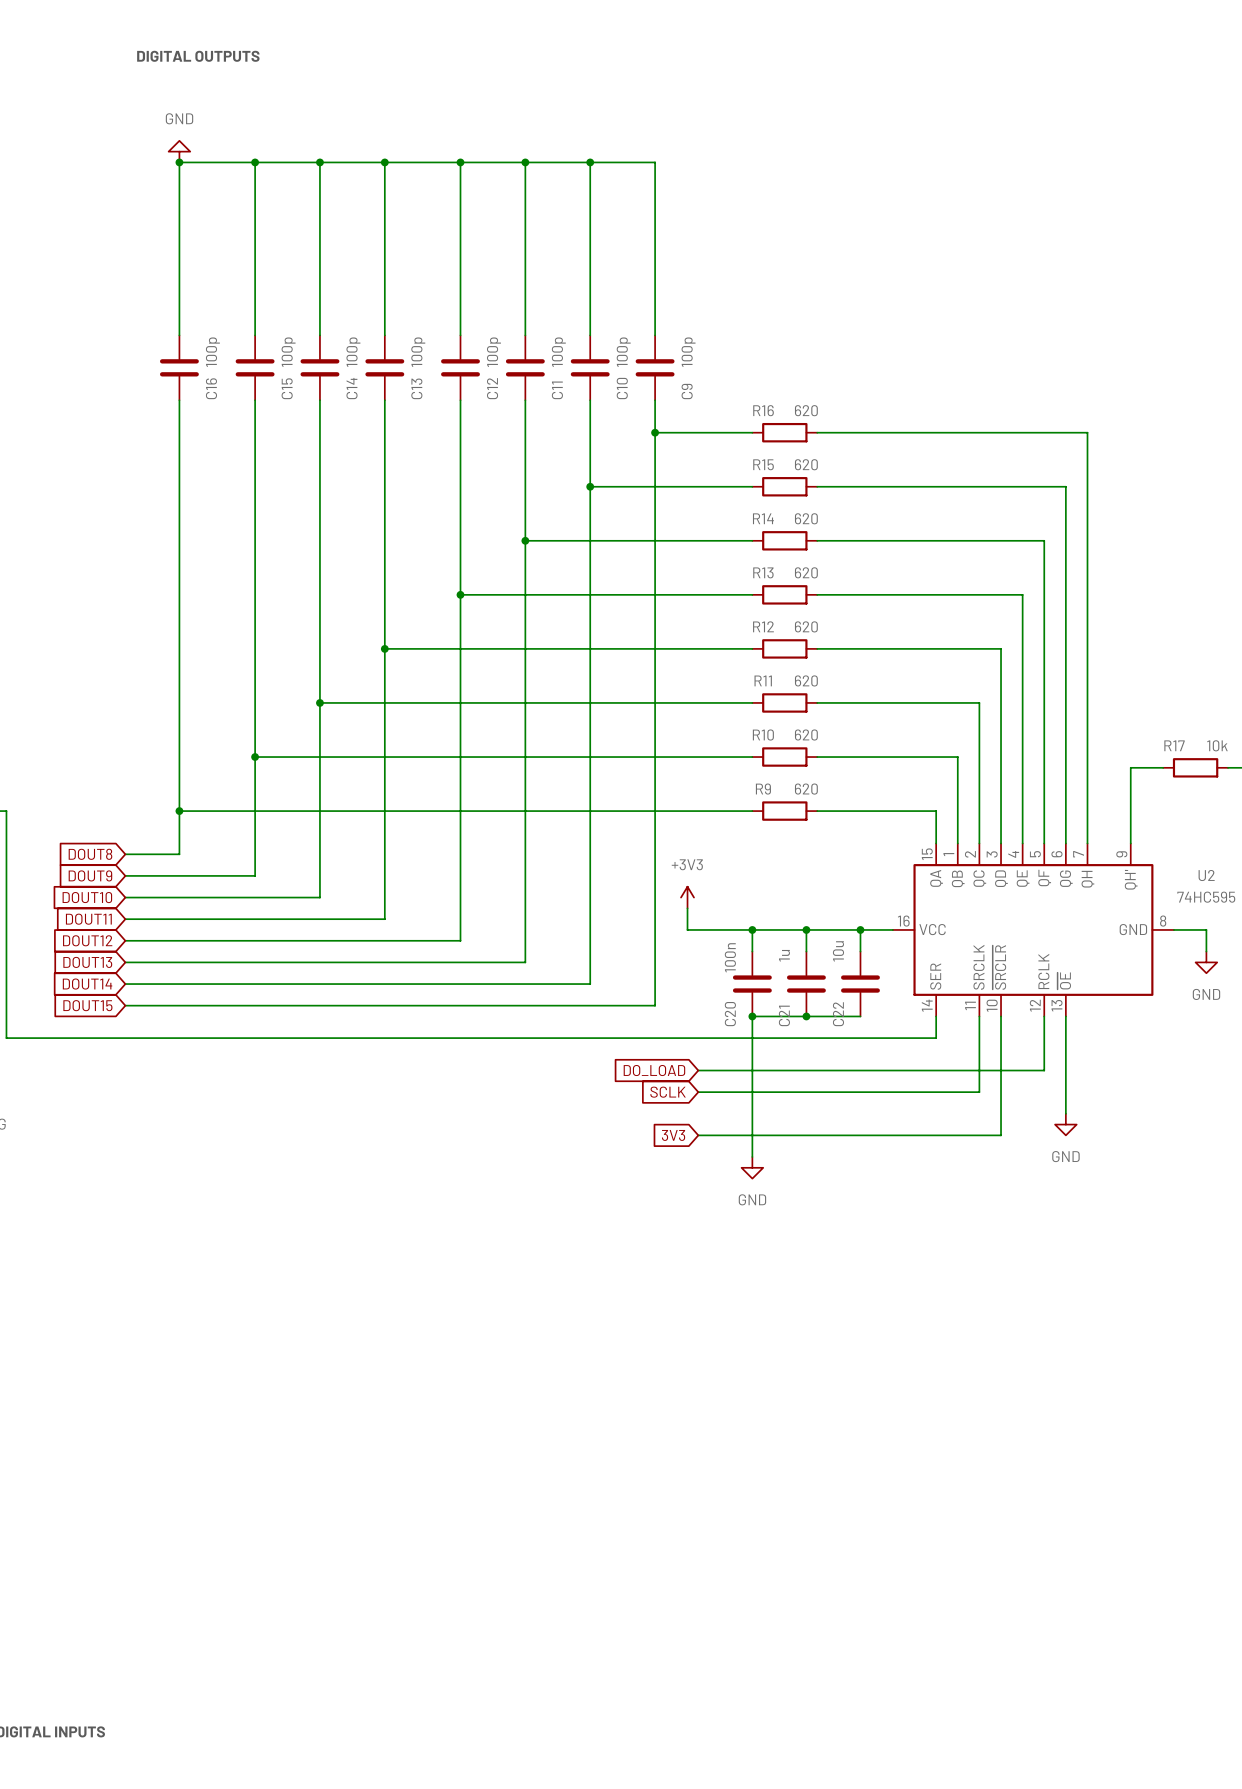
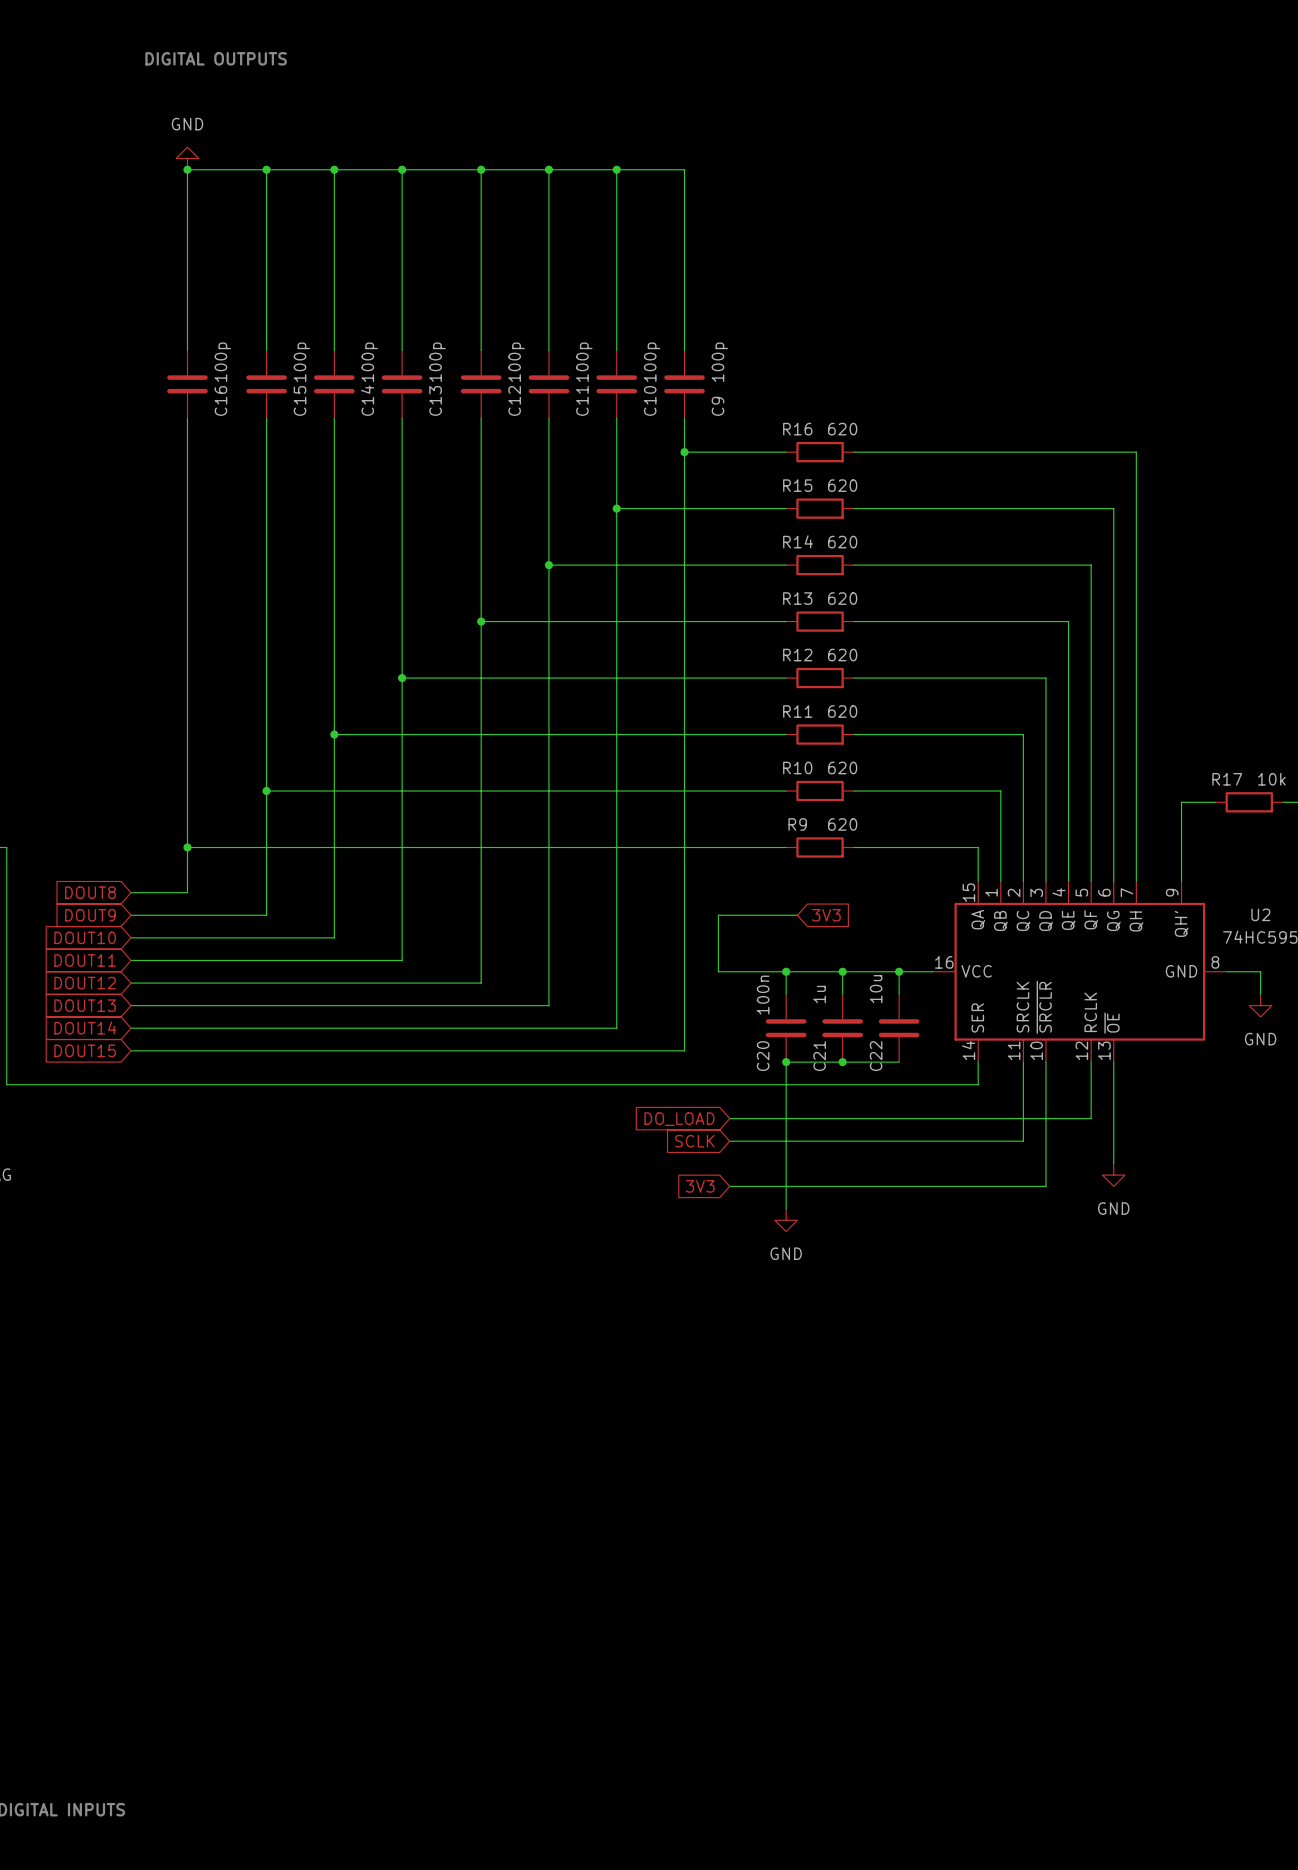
wire: none -> (797, 915) (718, 915) (718, 949)
global label: none -> 3V3 (826, 915)
power symbol: +3V3 (687, 897) -> none

